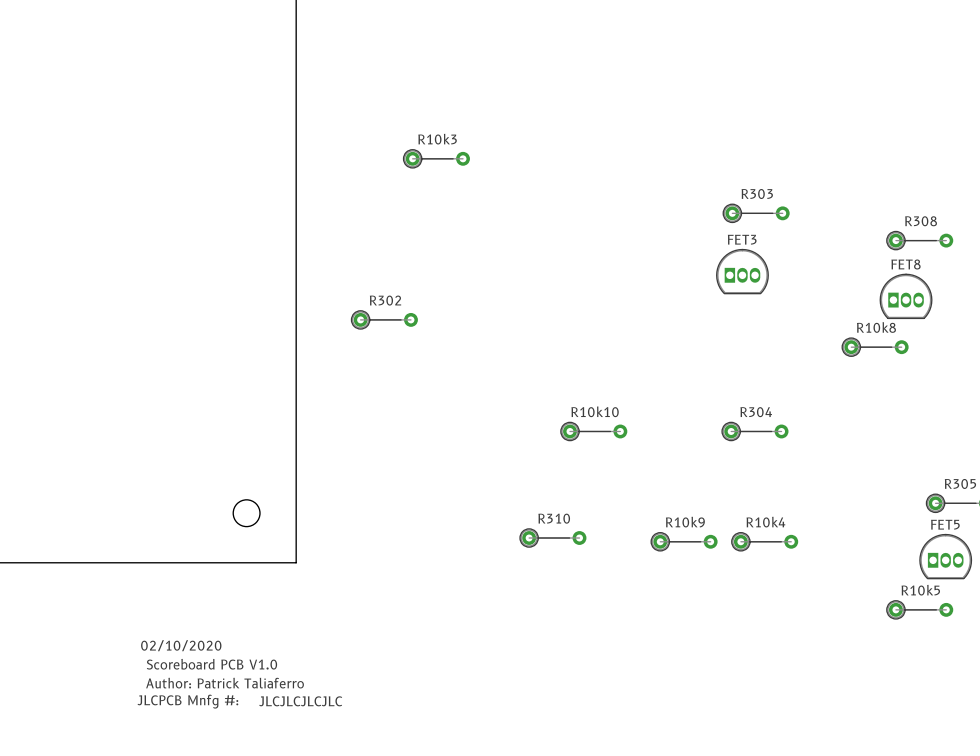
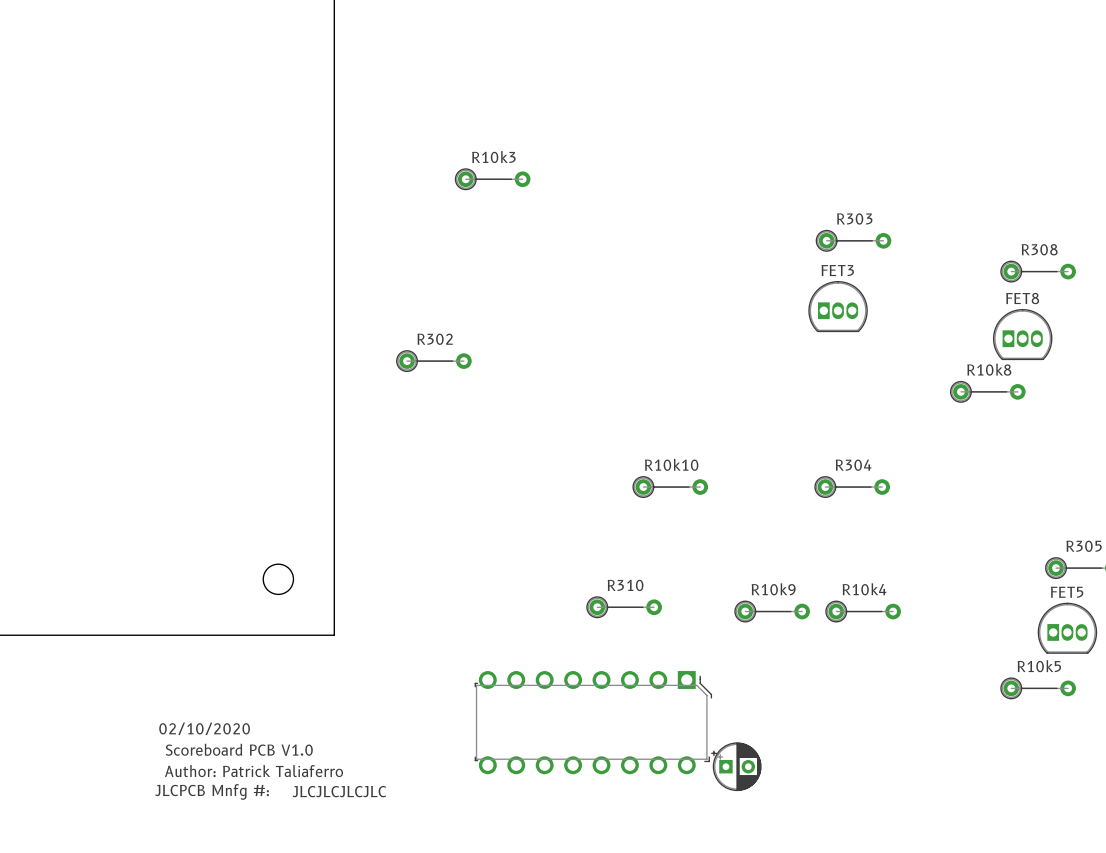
part: none -> (593, 722)
part: none -> (736, 766)

